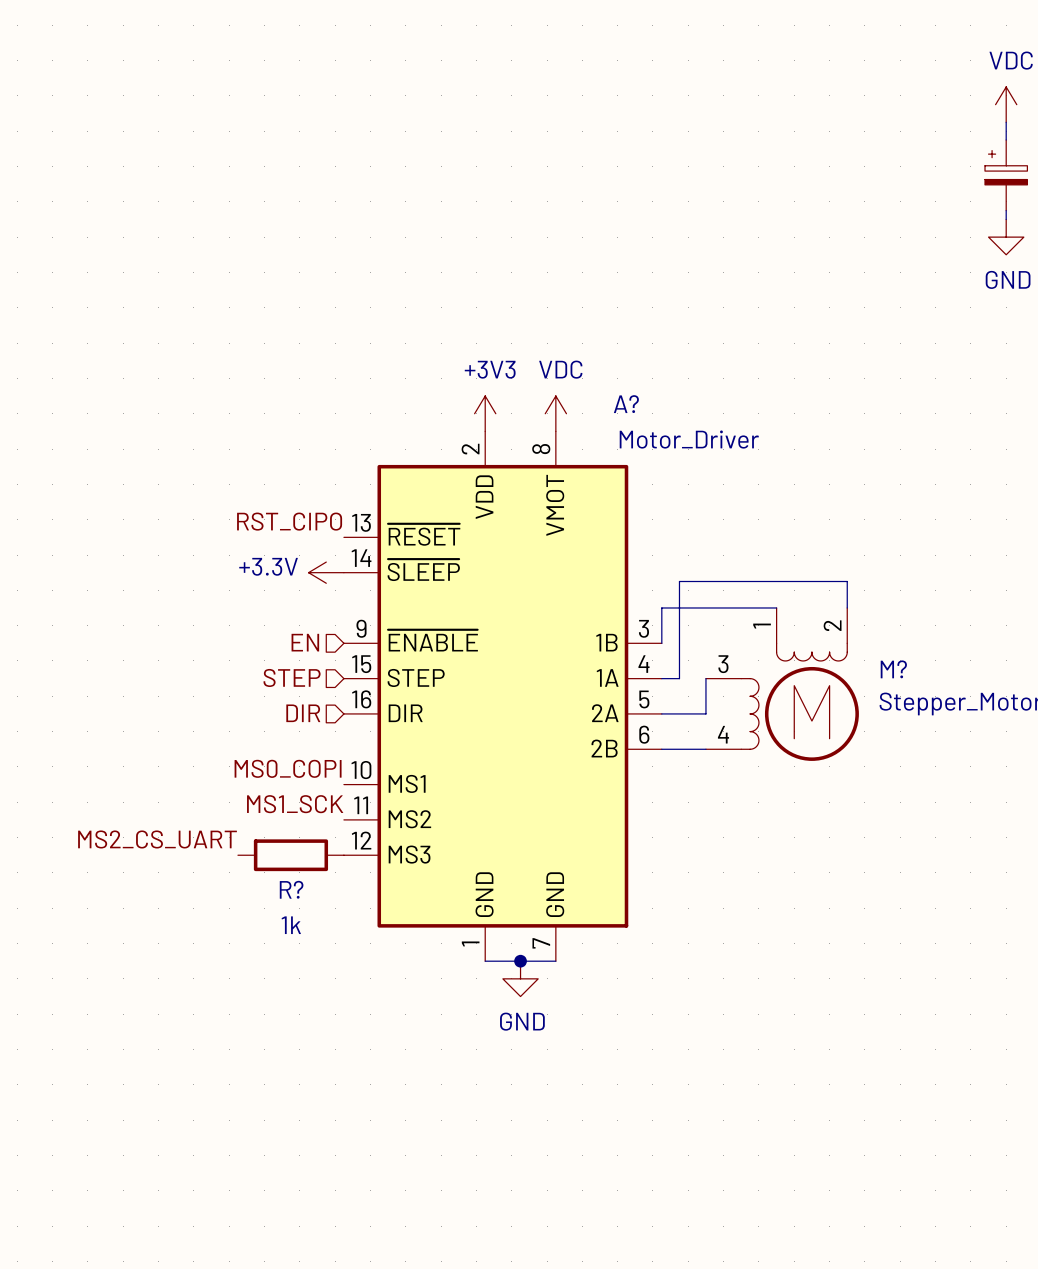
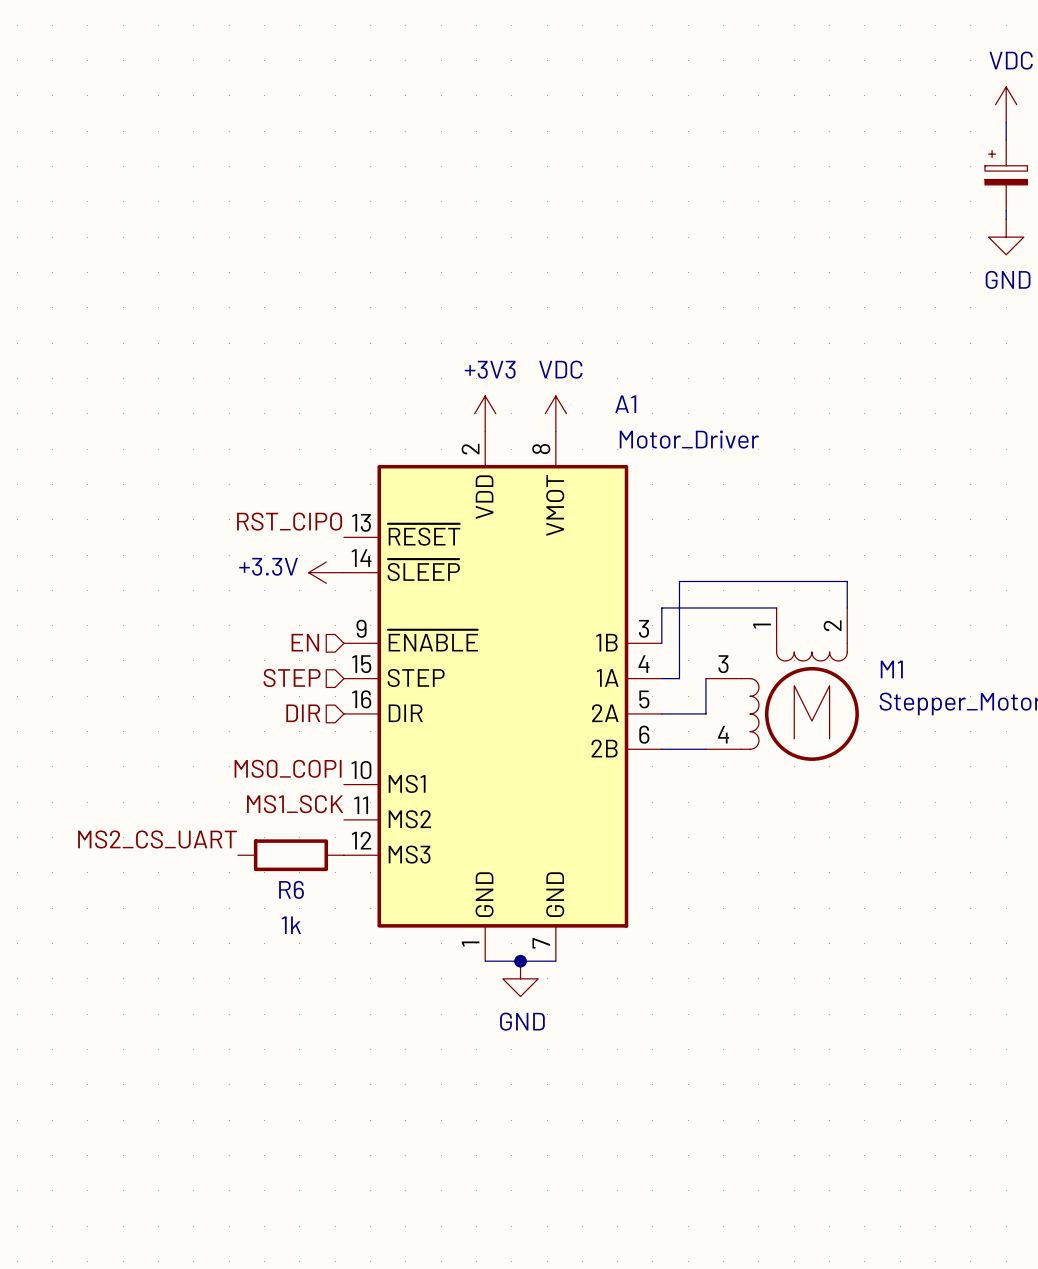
A? name: A? (626, 404) -> A1 (625, 404)
M? name: M? (893, 669) -> M1 (891, 669)
R? name: R? (291, 889) -> R6 (291, 889)

